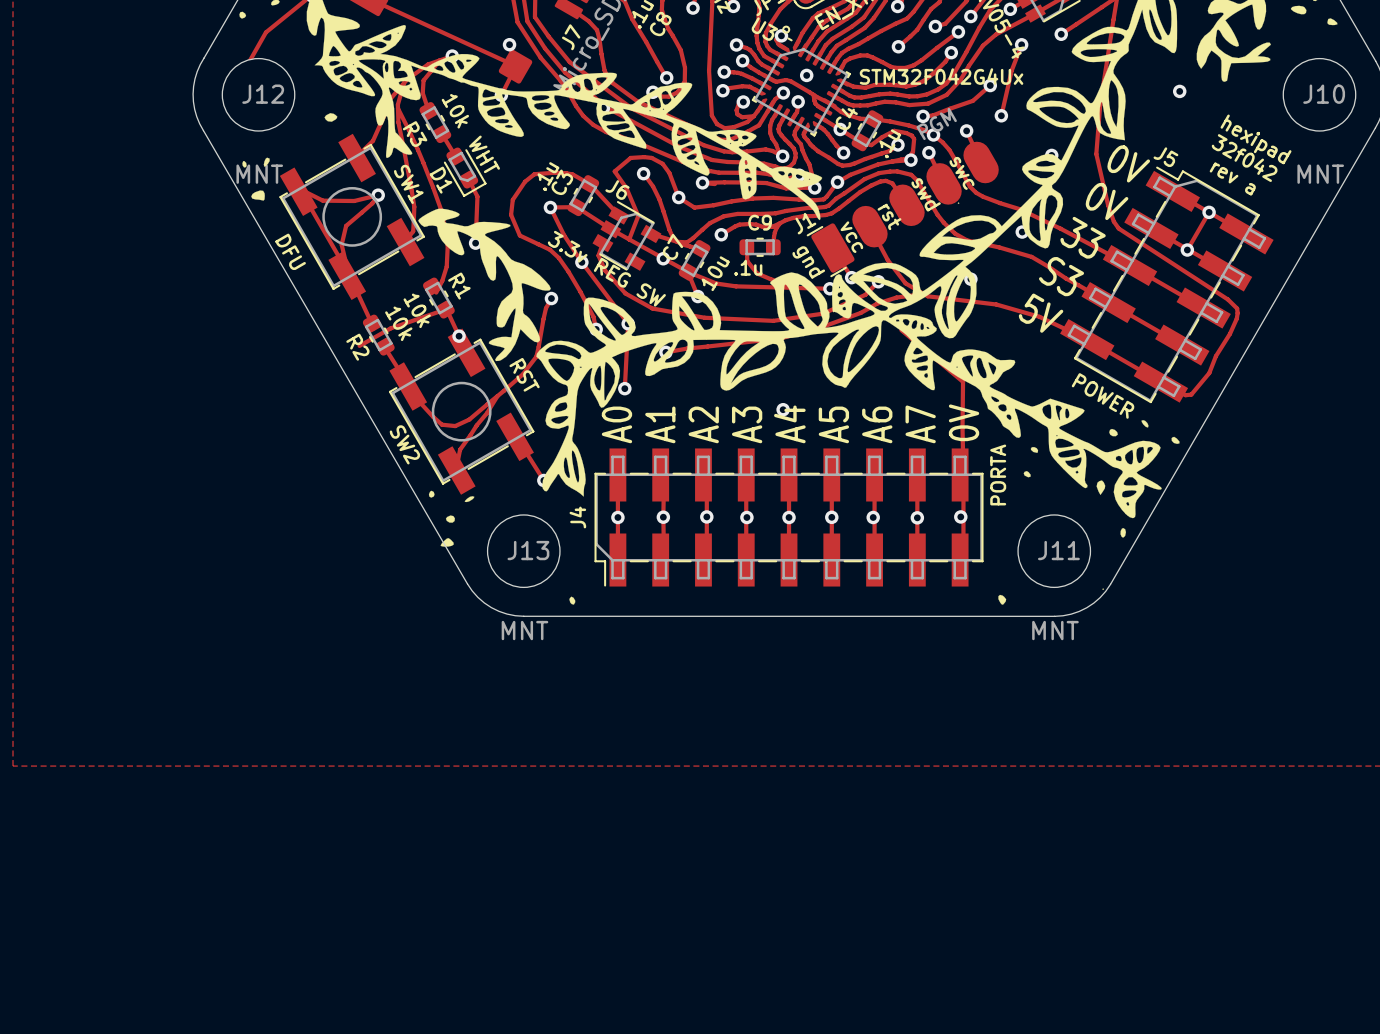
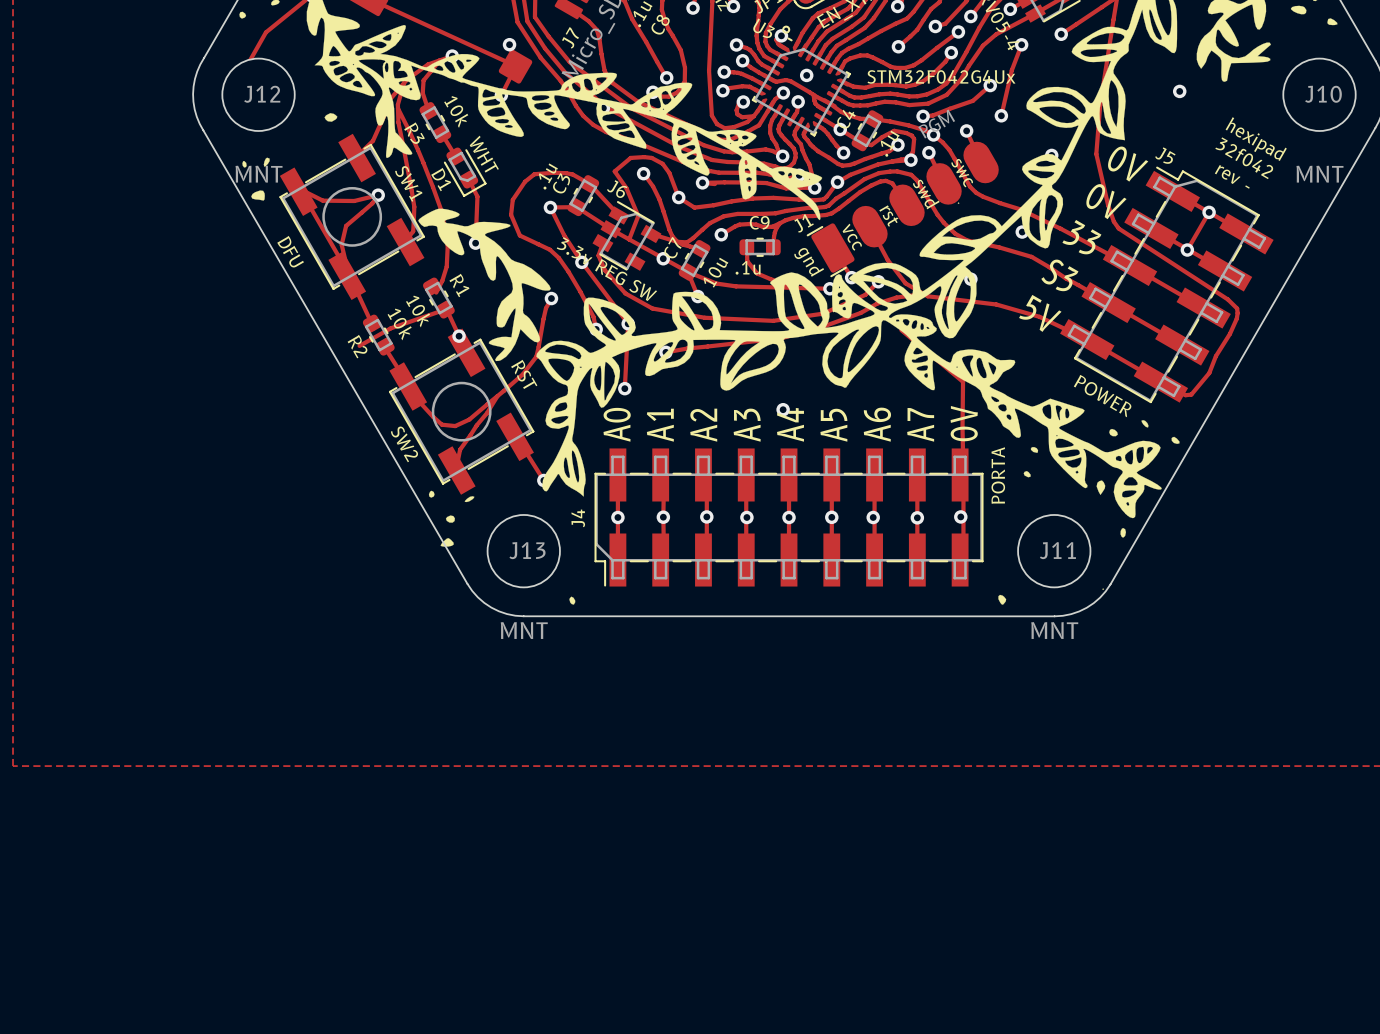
text: rev a (1232, 178) -> rev - (1232, 176)

